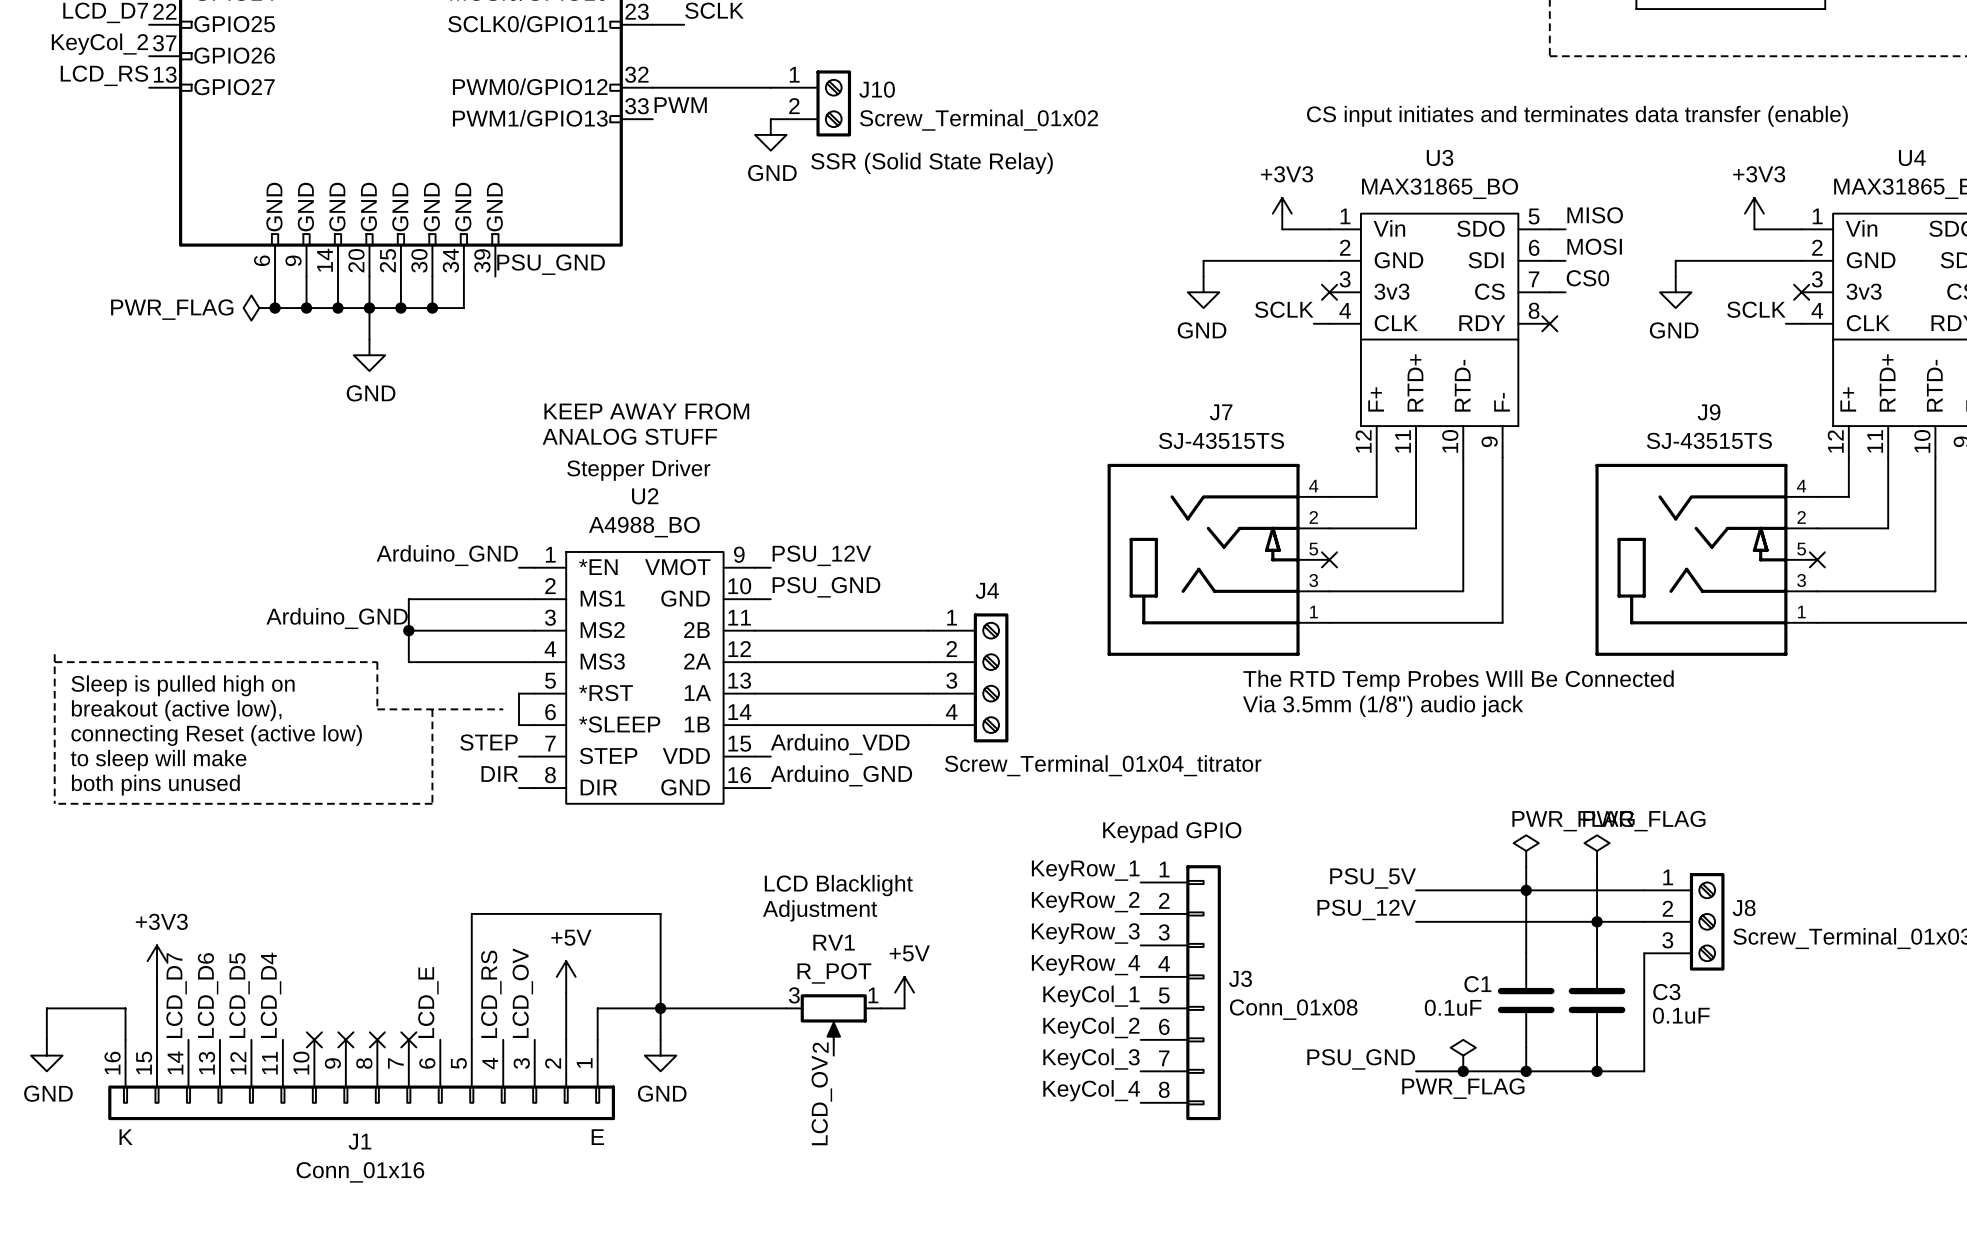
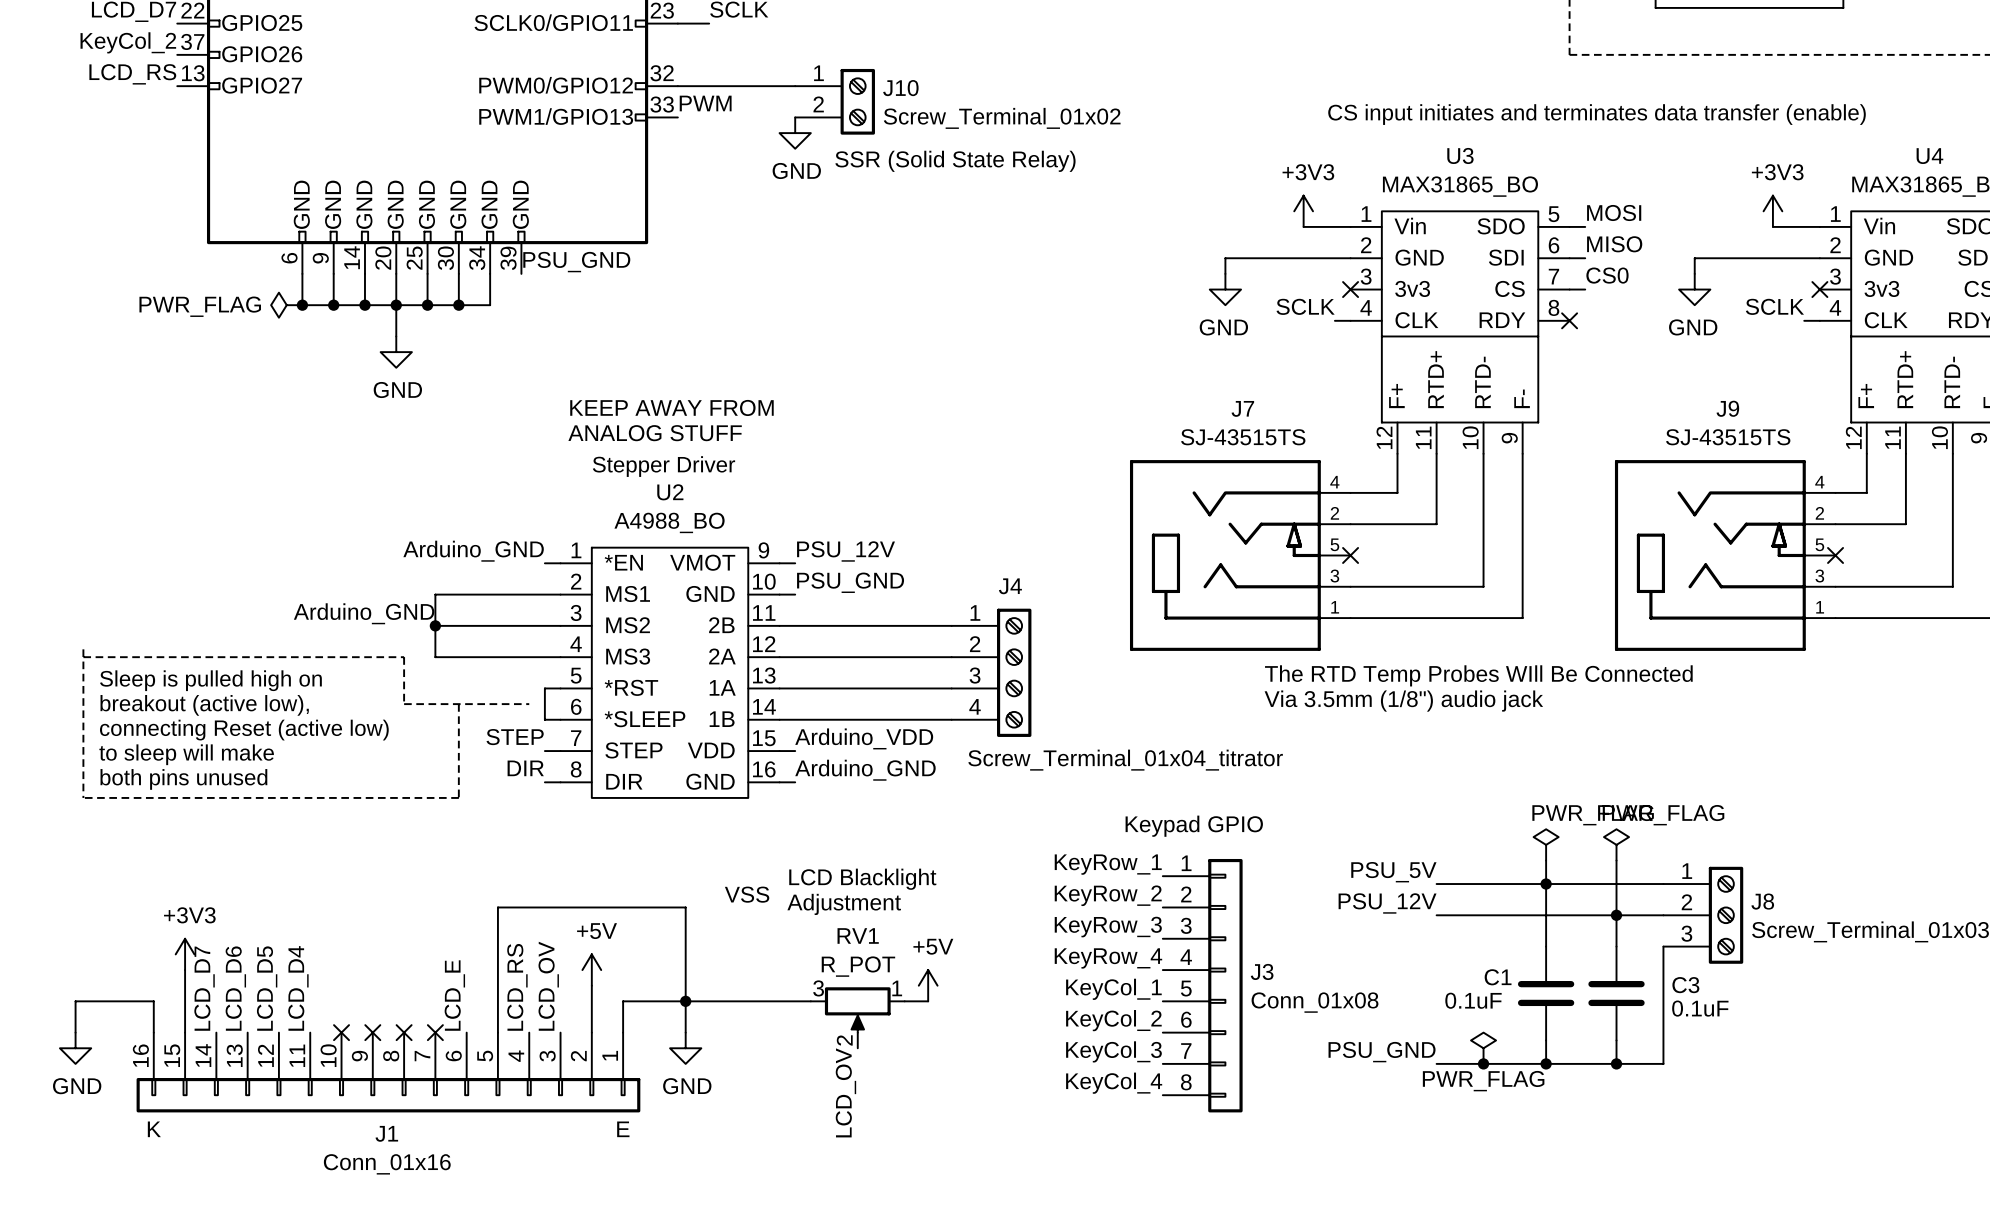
label: MISO (1595, 215) -> MOSI (1614, 212)
label: MOSI (1594, 246) -> MISO (1614, 244)
text: none -> VSS (747, 894)

